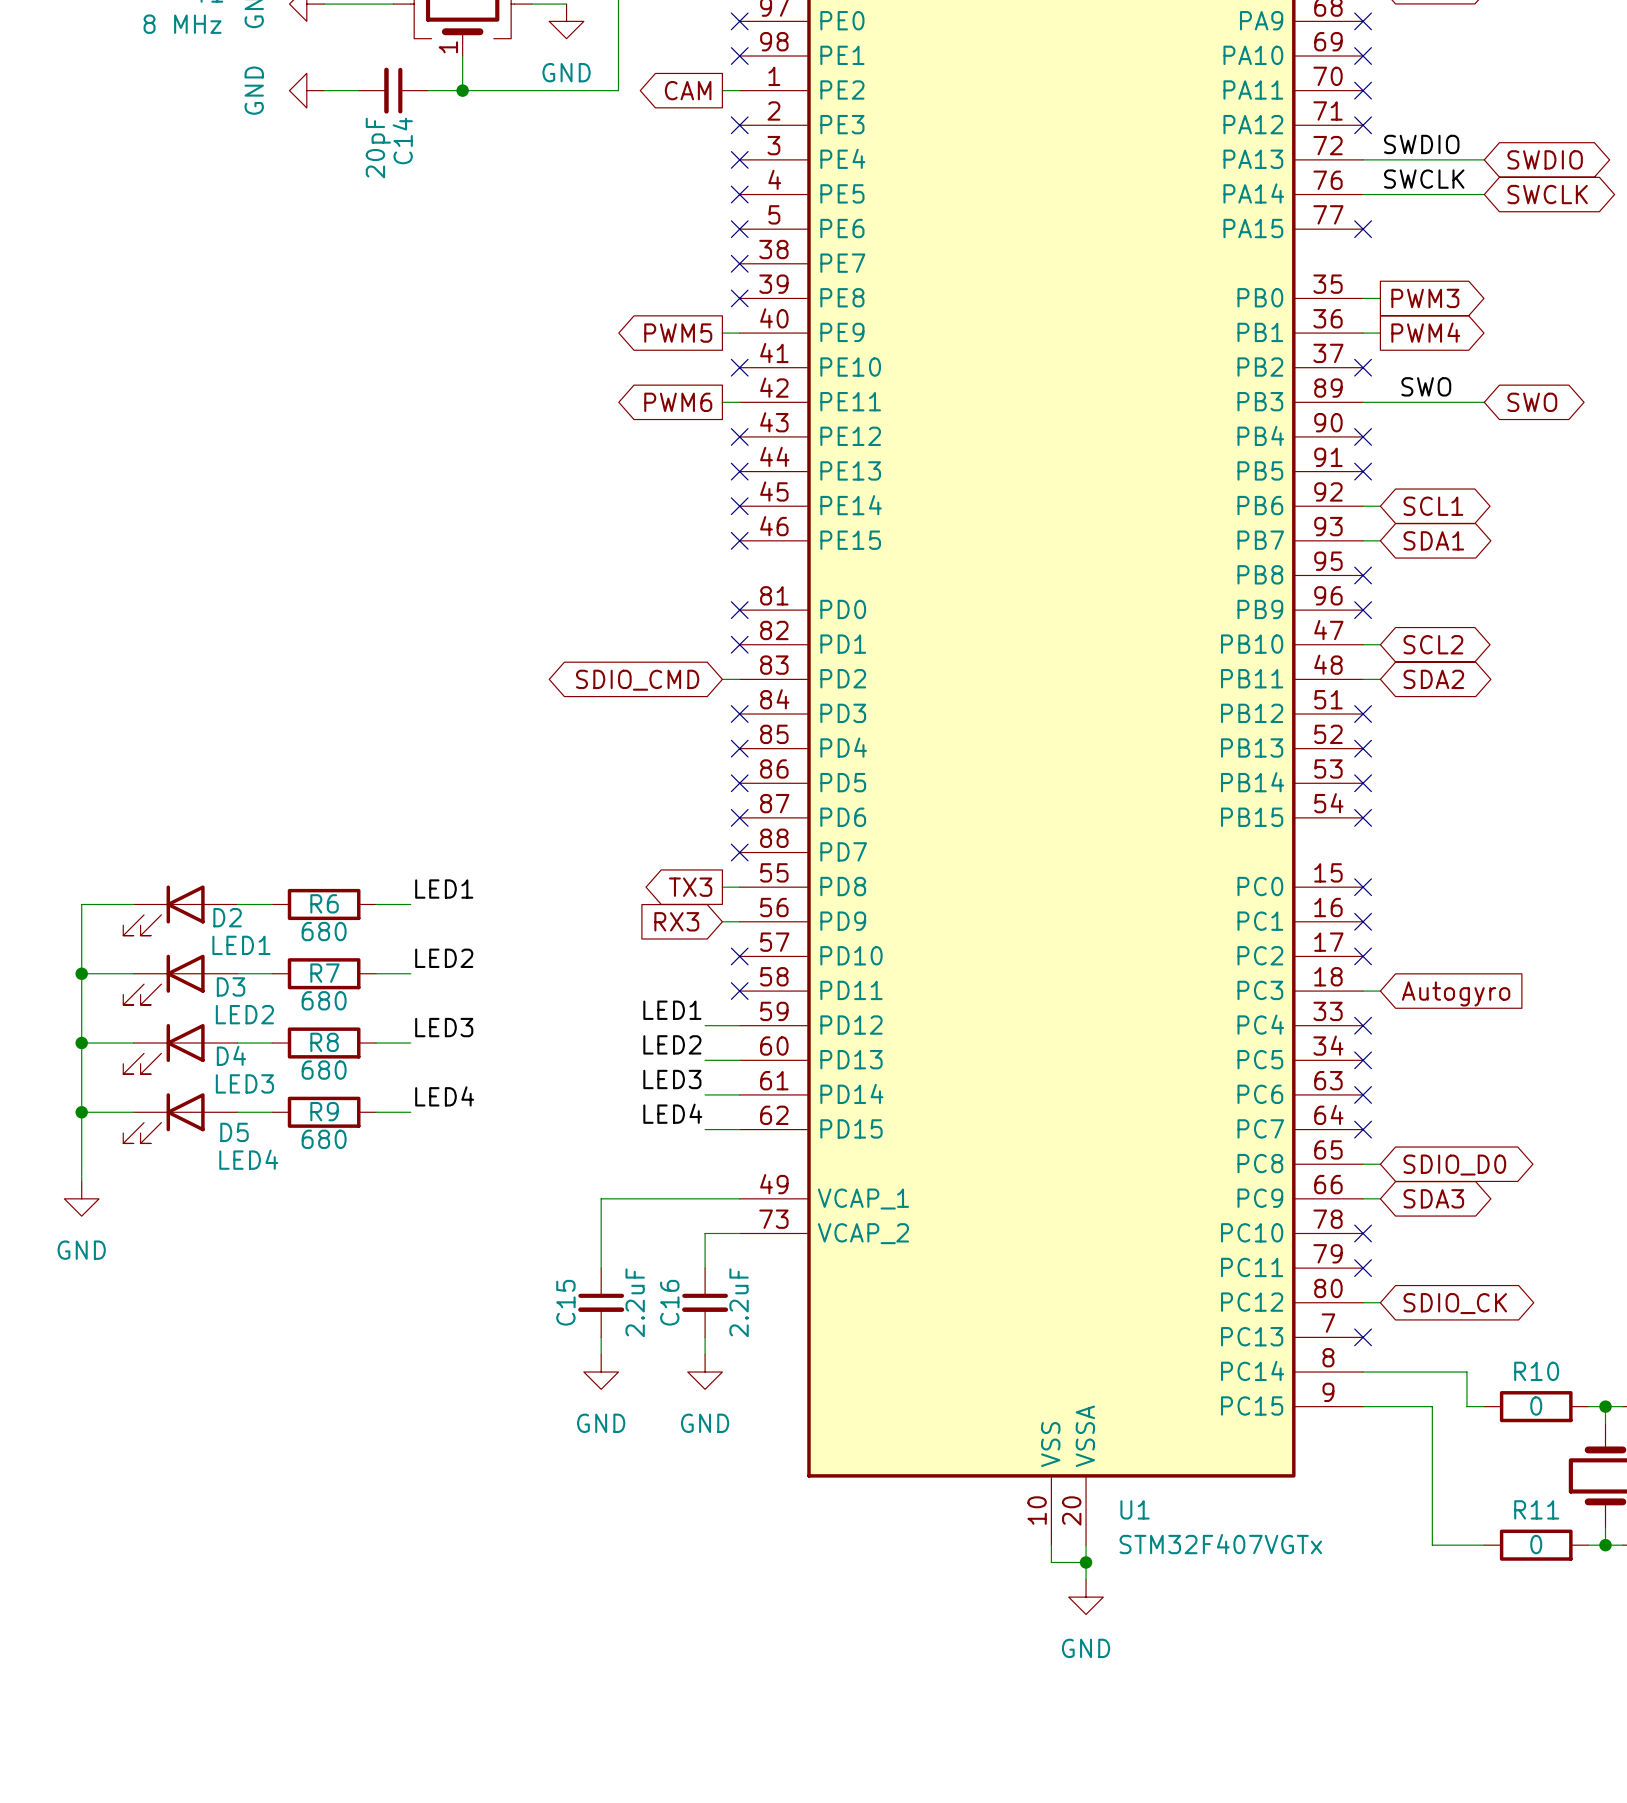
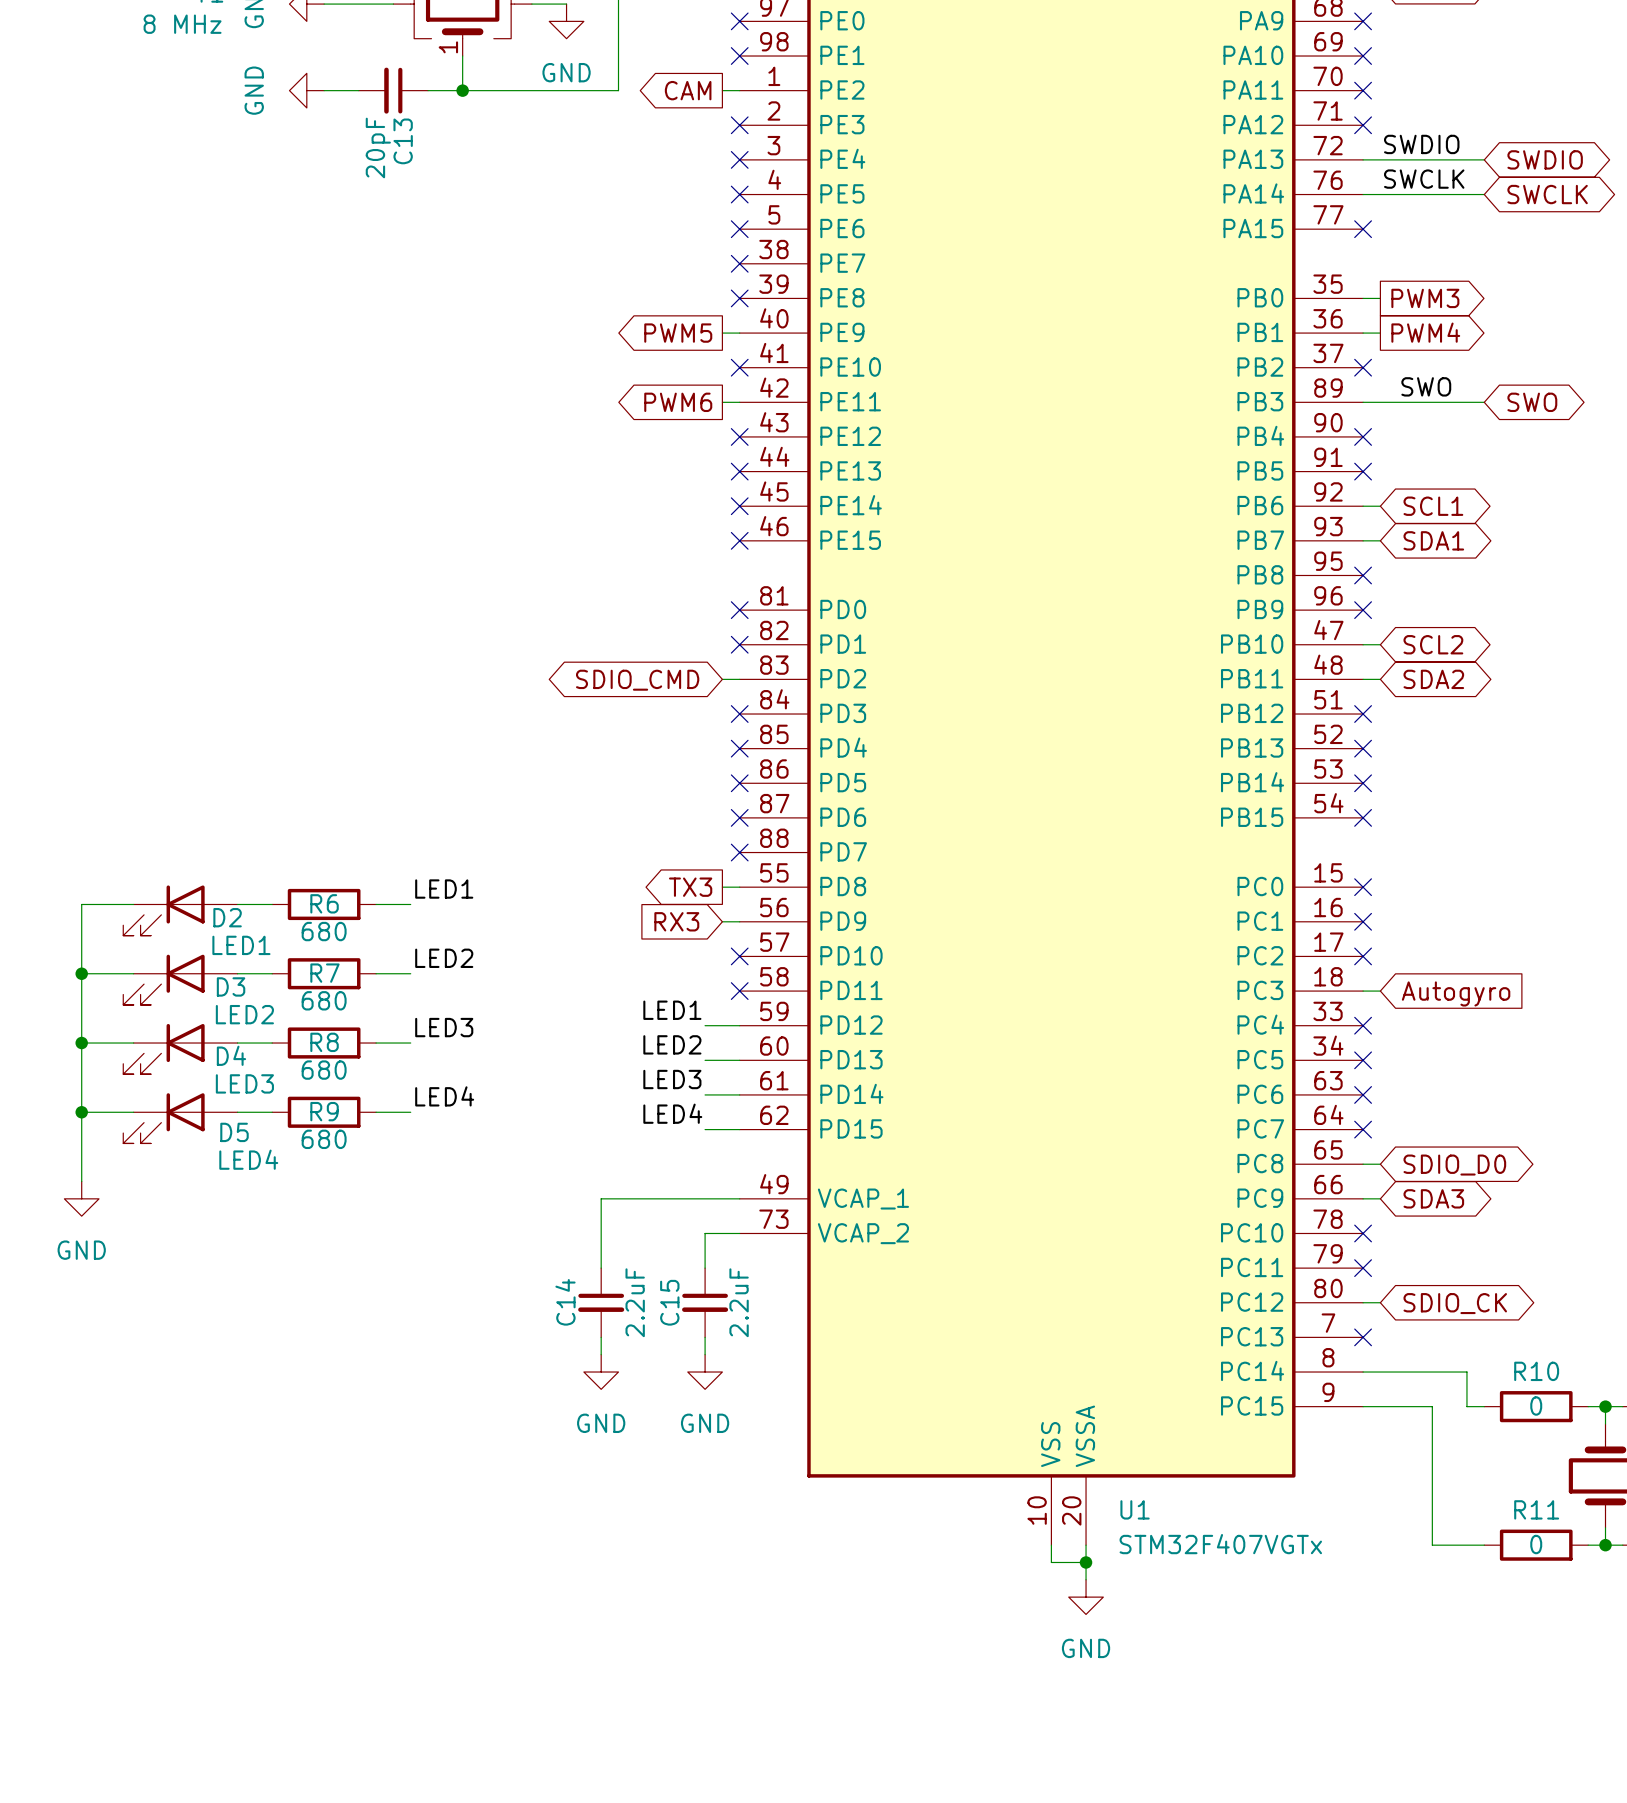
C14 name: C14 (402, 140) -> C13 (403, 141)
C15 name: C15 (565, 1302) -> C14 (565, 1302)
C16 name: C16 (669, 1302) -> C15 (669, 1302)

